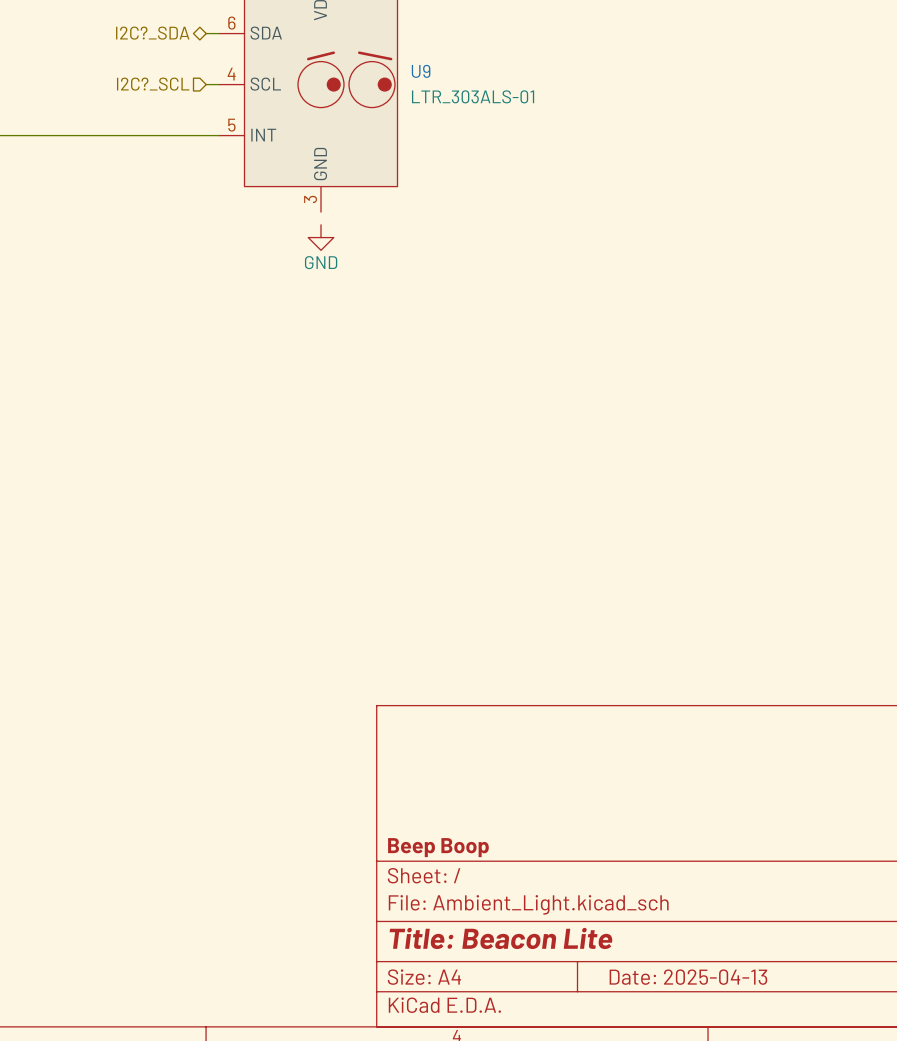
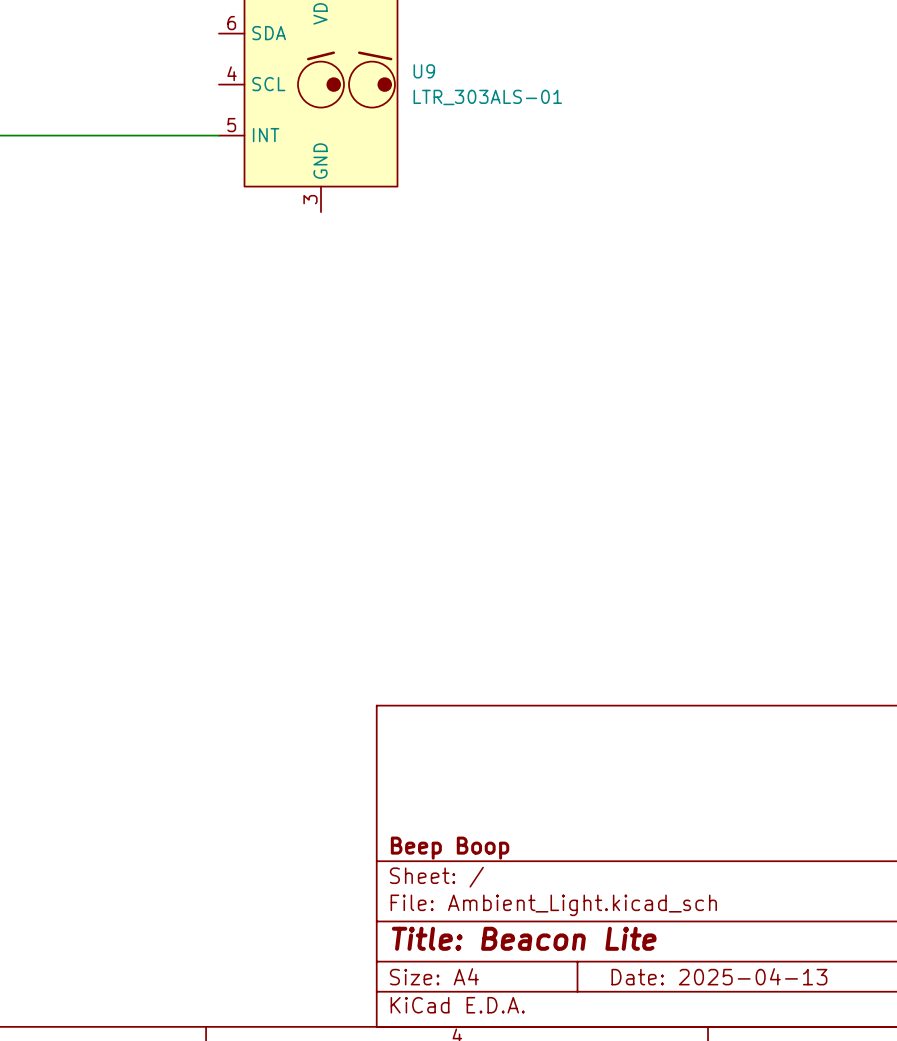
hierarchical label: I2C?_SDA (152, 33) -> none
wire: (206, 33) (219, 33) -> none
hierarchical label: I2C?_SCL (153, 84) -> none
wire: (206, 84) (219, 84) -> none
power symbol: GND (321, 237) -> none

